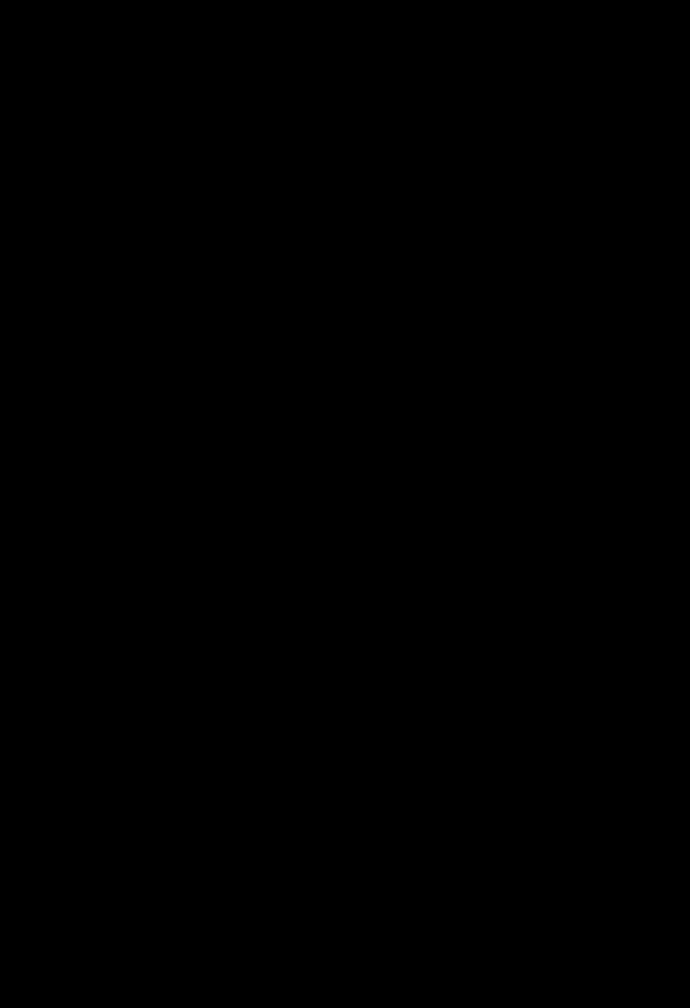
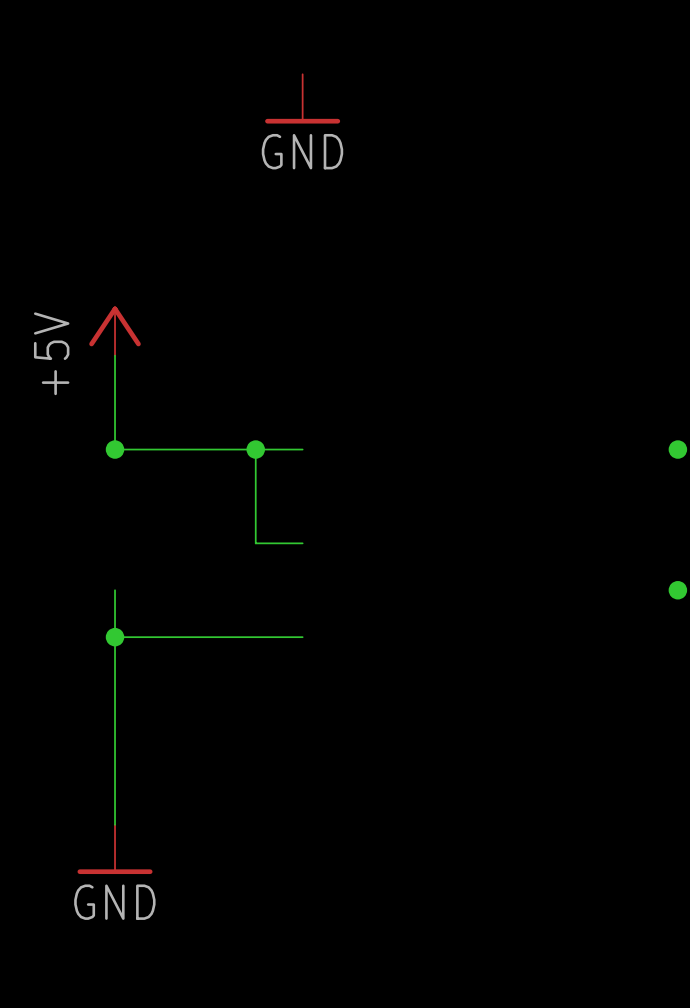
power symbol: none -> GND (302, 98)
power symbol: none -> +5V (115, 331)
wire: none -> (115, 355) (115, 449) (302, 449)
junction: none -> (115, 449)
wire: none -> (255, 449) (255, 543) (302, 543)
junction: none -> (255, 449)
junction: none -> (677, 449)
wire: none -> (115, 590) (115, 824)
junction: none -> (677, 590)
wire: none -> (115, 637) (302, 637)
junction: none -> (115, 637)
power symbol: none -> GND (115, 849)

